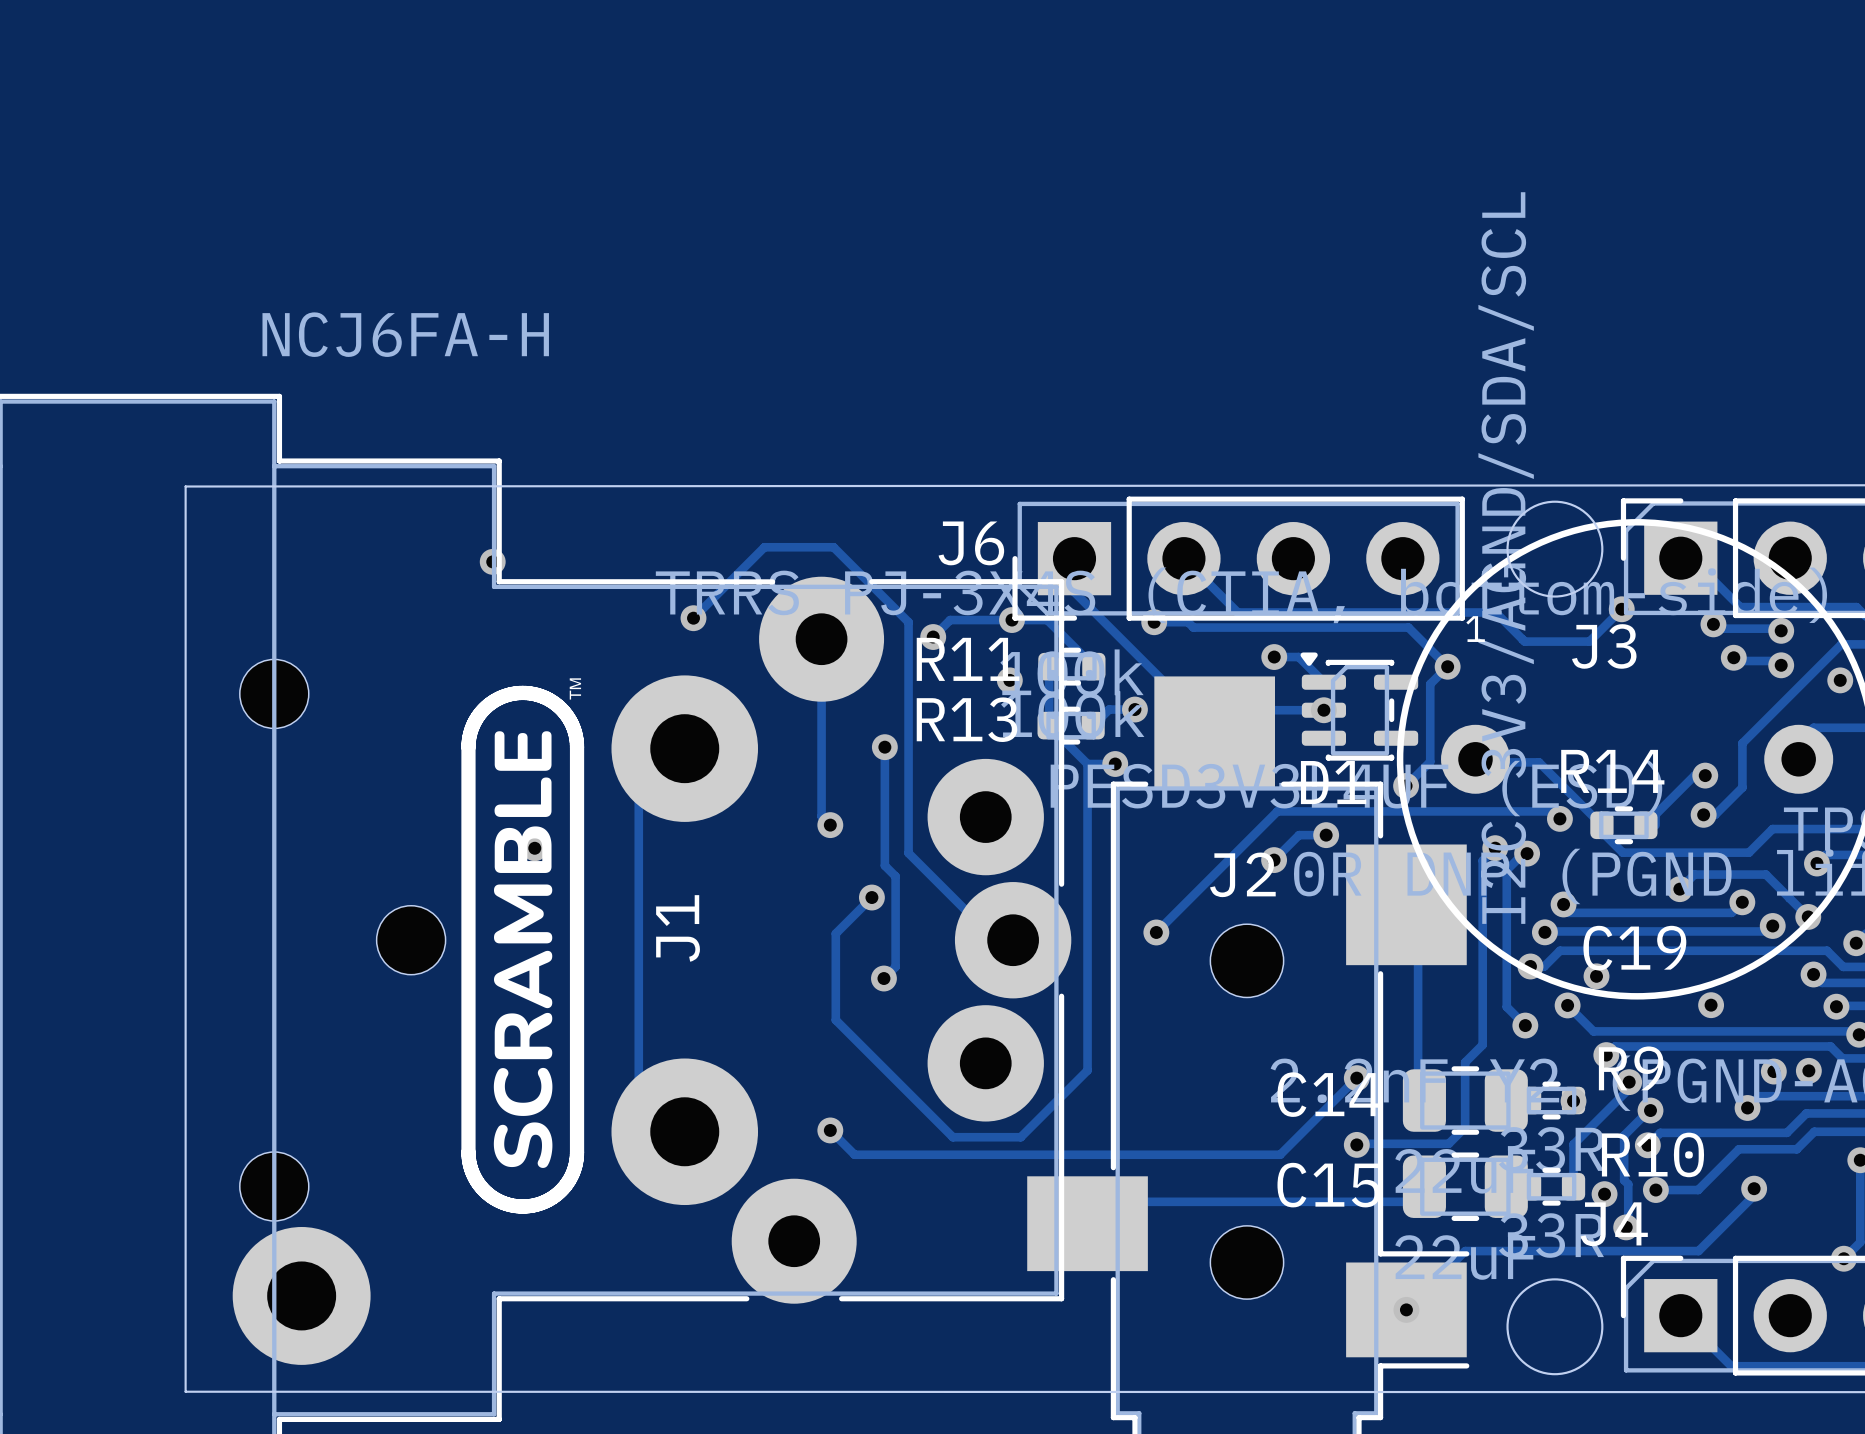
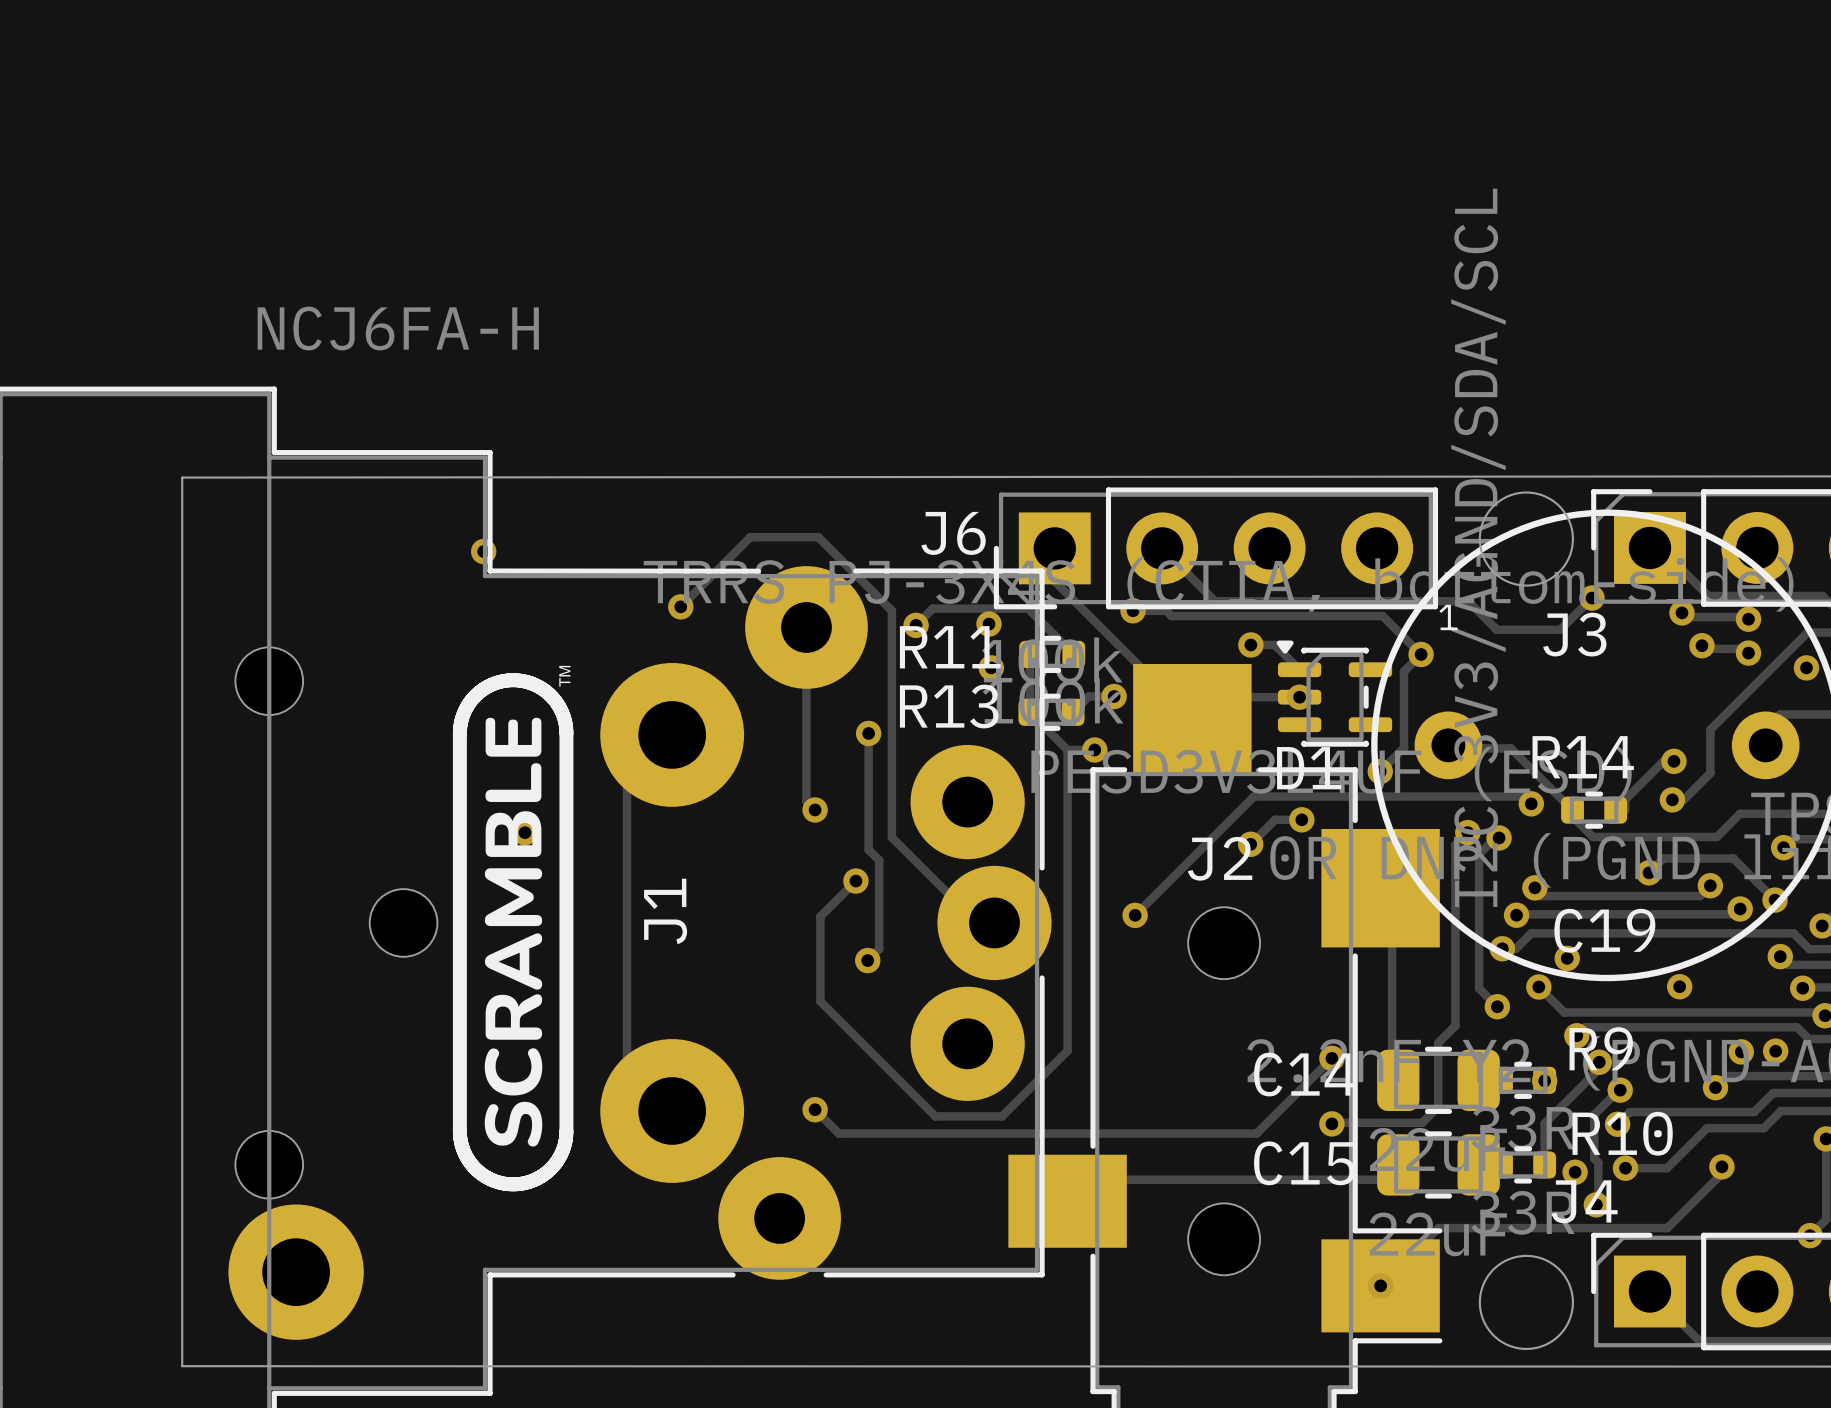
via position: (1011, 620) -> (989, 624)

